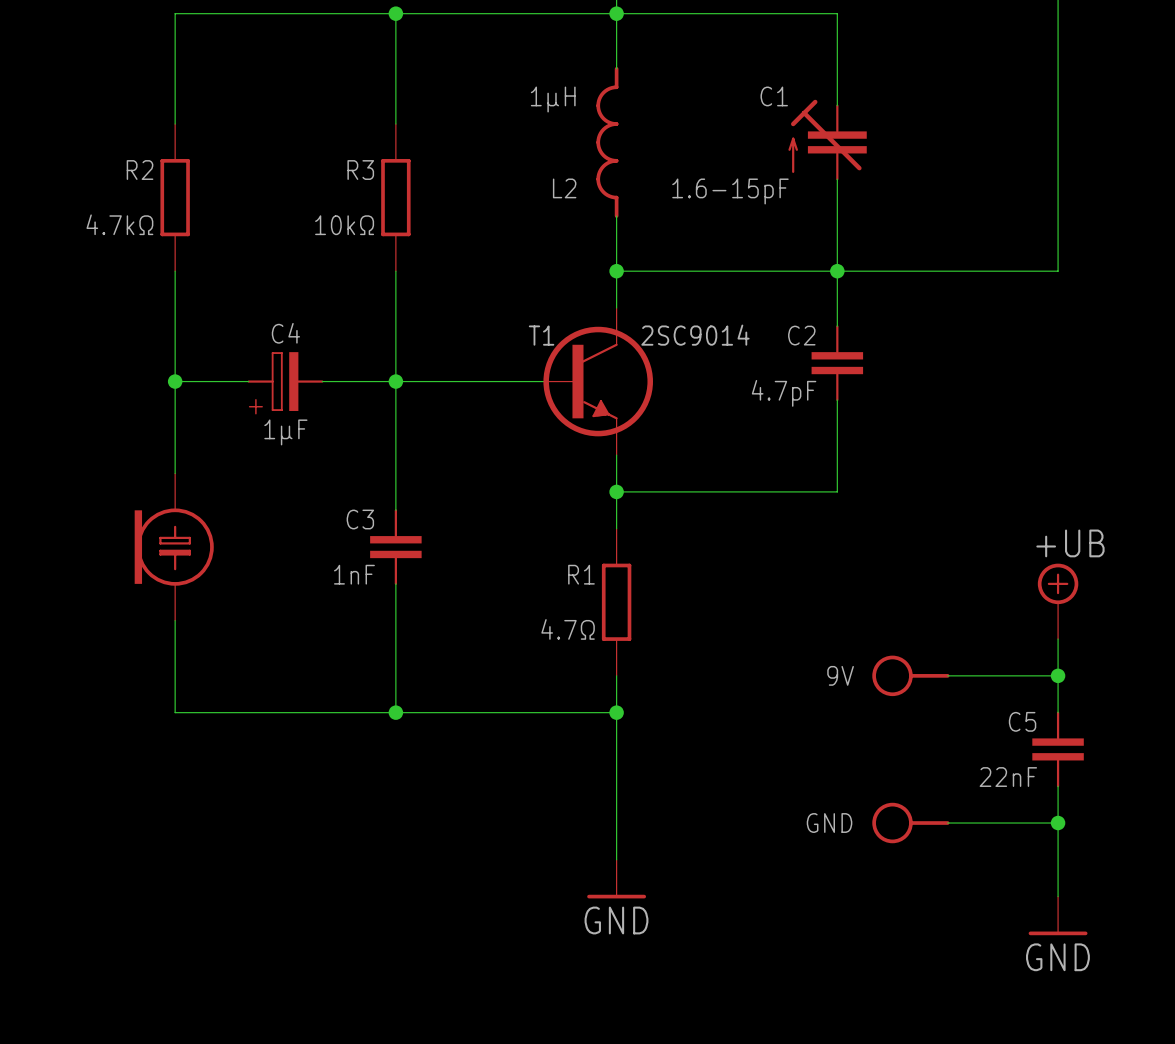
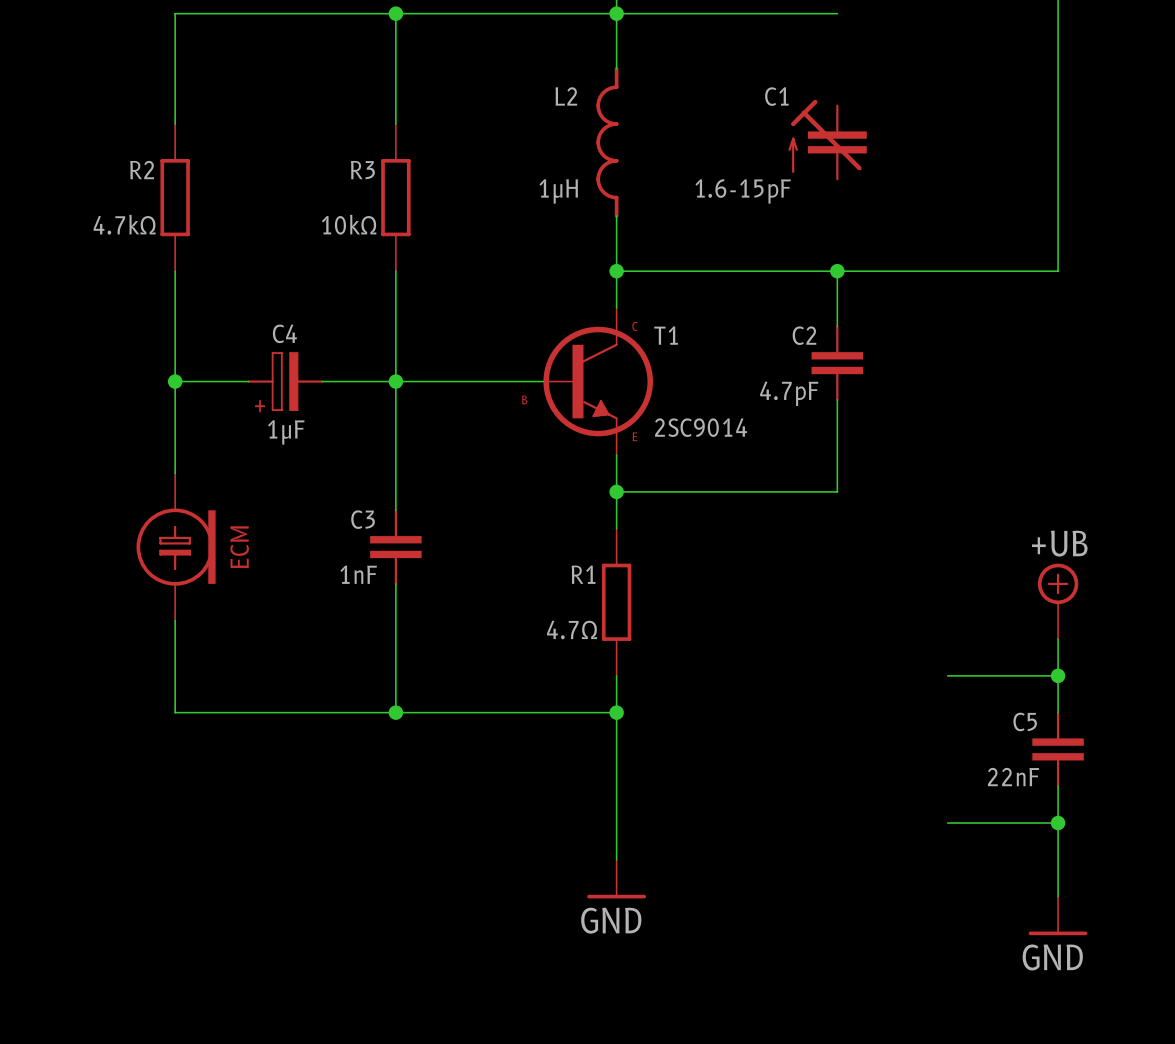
wire: (837, 13) (837, 105) -> none
L2 value position: 1μH (553, 99) -> 1μH (558, 191)
wire: (837, 179) (837, 271) -> none
L2 name position: L2 (564, 188) -> L2 (566, 96)
T1 text: none -> C (635, 326)
T1 name position: T1 (541, 335) -> T1 (666, 335)
T1 value position: 2SC9014 (695, 335) -> 2SC9014 (701, 427)
T1 text: none -> B (524, 399)
T1 text: none -> E (635, 436)
part symbol: [134, 473, 214, 621] -> [136, 473, 216, 621]
9V: (910, 675) -> none
GND: (910, 823) -> none

